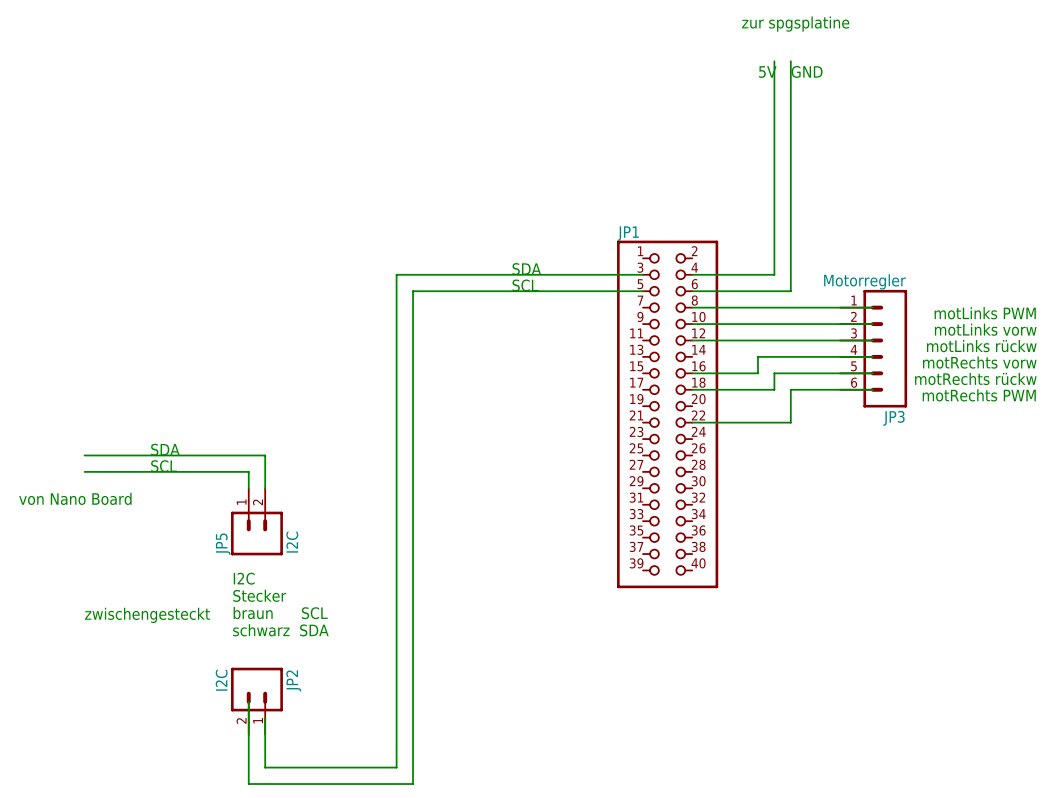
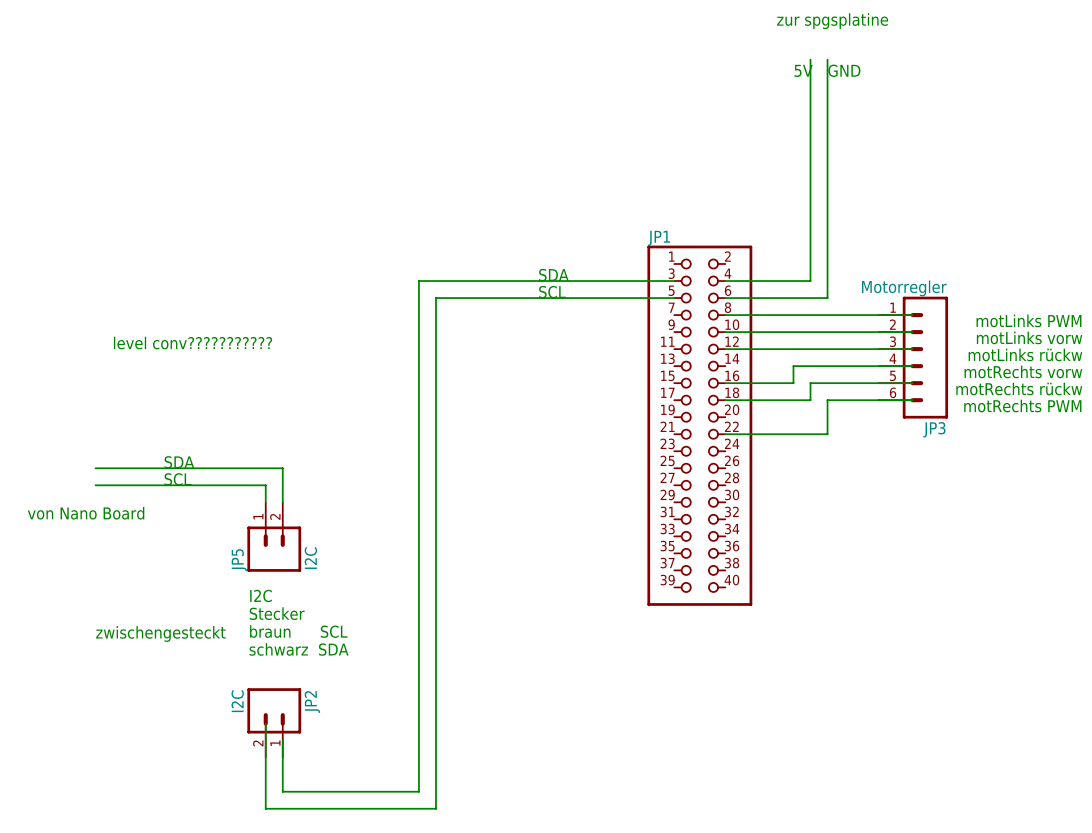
text: none -> level conv??????????? (193, 343)

